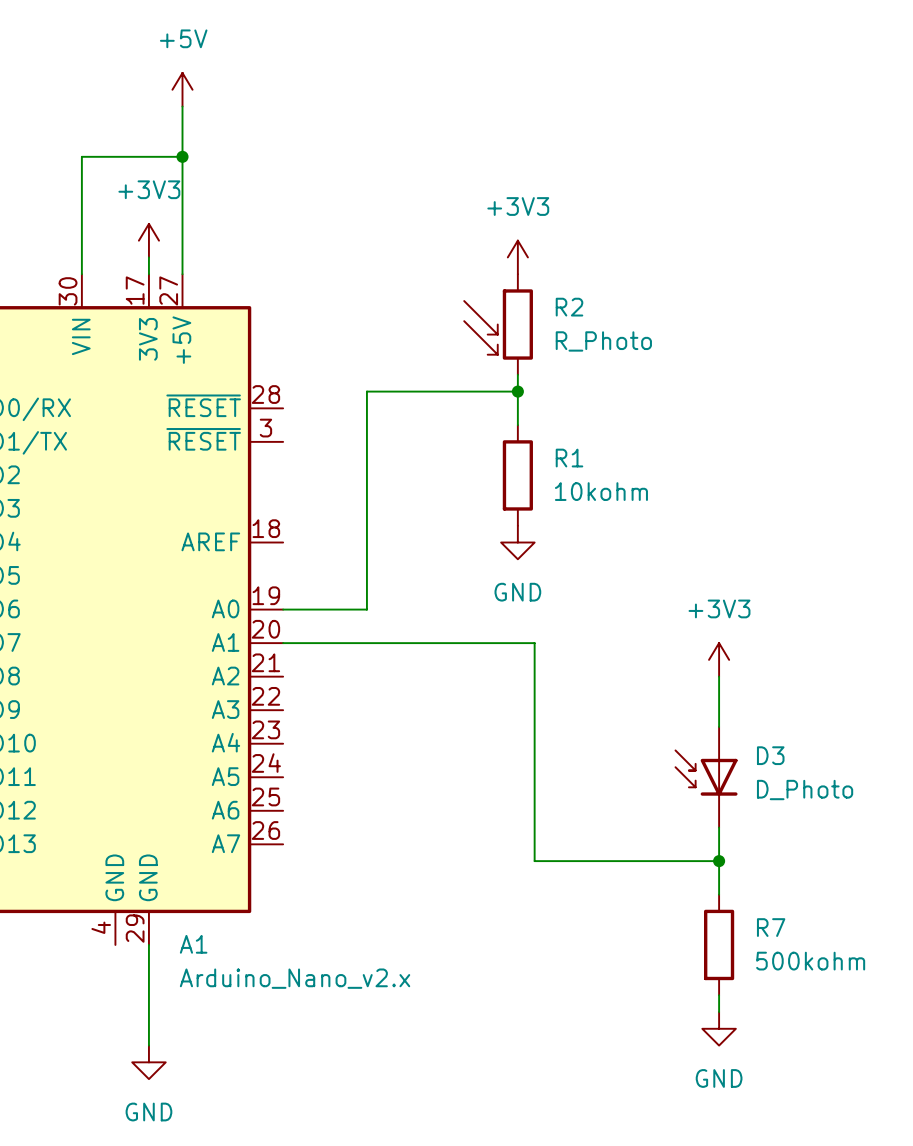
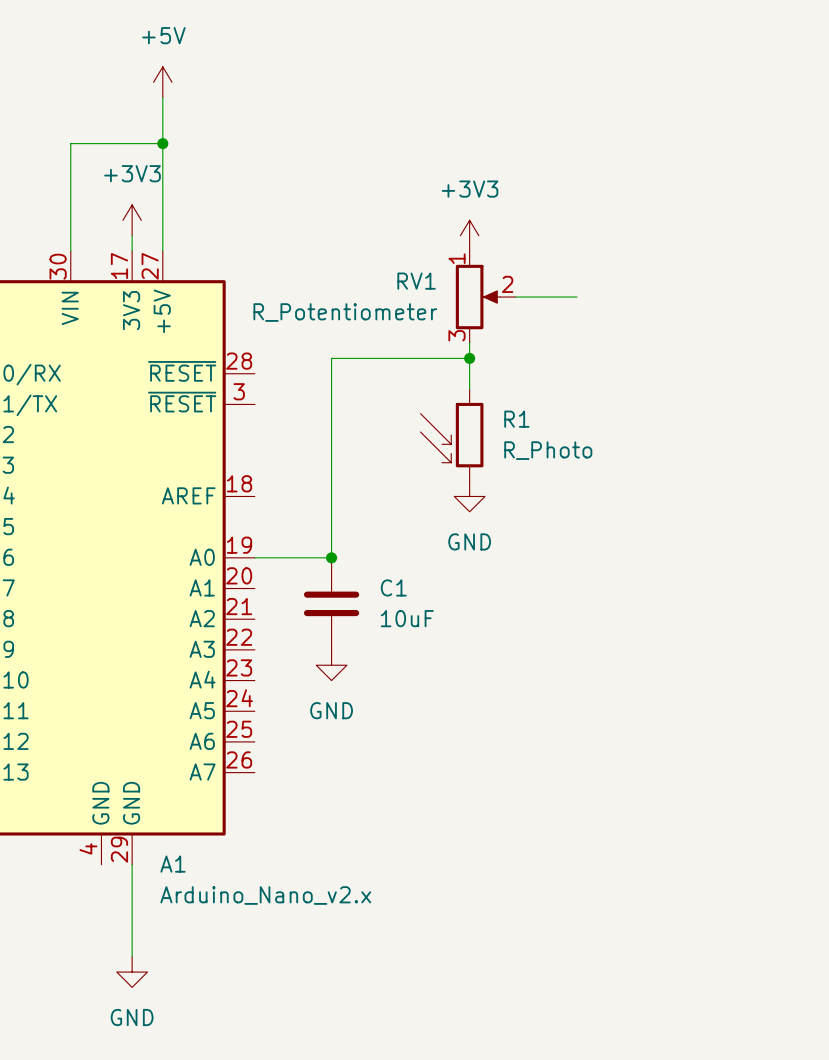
R2: R_Photo (498, 324) -> none
RV1: none -> R_Potentiometer (485, 297)
wire: none -> (515, 297) (577, 297)
R1 symbol: [502, 425, 533, 526] -> [420, 389, 484, 482]
R1 value: 10kohm (601, 491) -> R_Photo (548, 450)
junction: none -> (331, 557)
wire: (283, 643) (534, 643) (534, 861) (719, 861) -> none
C1: none -> 10uF (331, 603)
power symbol: +3V3 (719, 659) -> none
wire: (719, 676) (719, 726) -> none
power symbol: none -> GND (331, 665)
D3: D_Photo (706, 777) -> none
wire: (719, 827) (719, 894) -> none
junction: (719, 861) -> none
R7: 500kohm (719, 944) -> none
wire: (719, 995) (719, 1012) -> none
power symbol: GND (719, 1028) -> none

